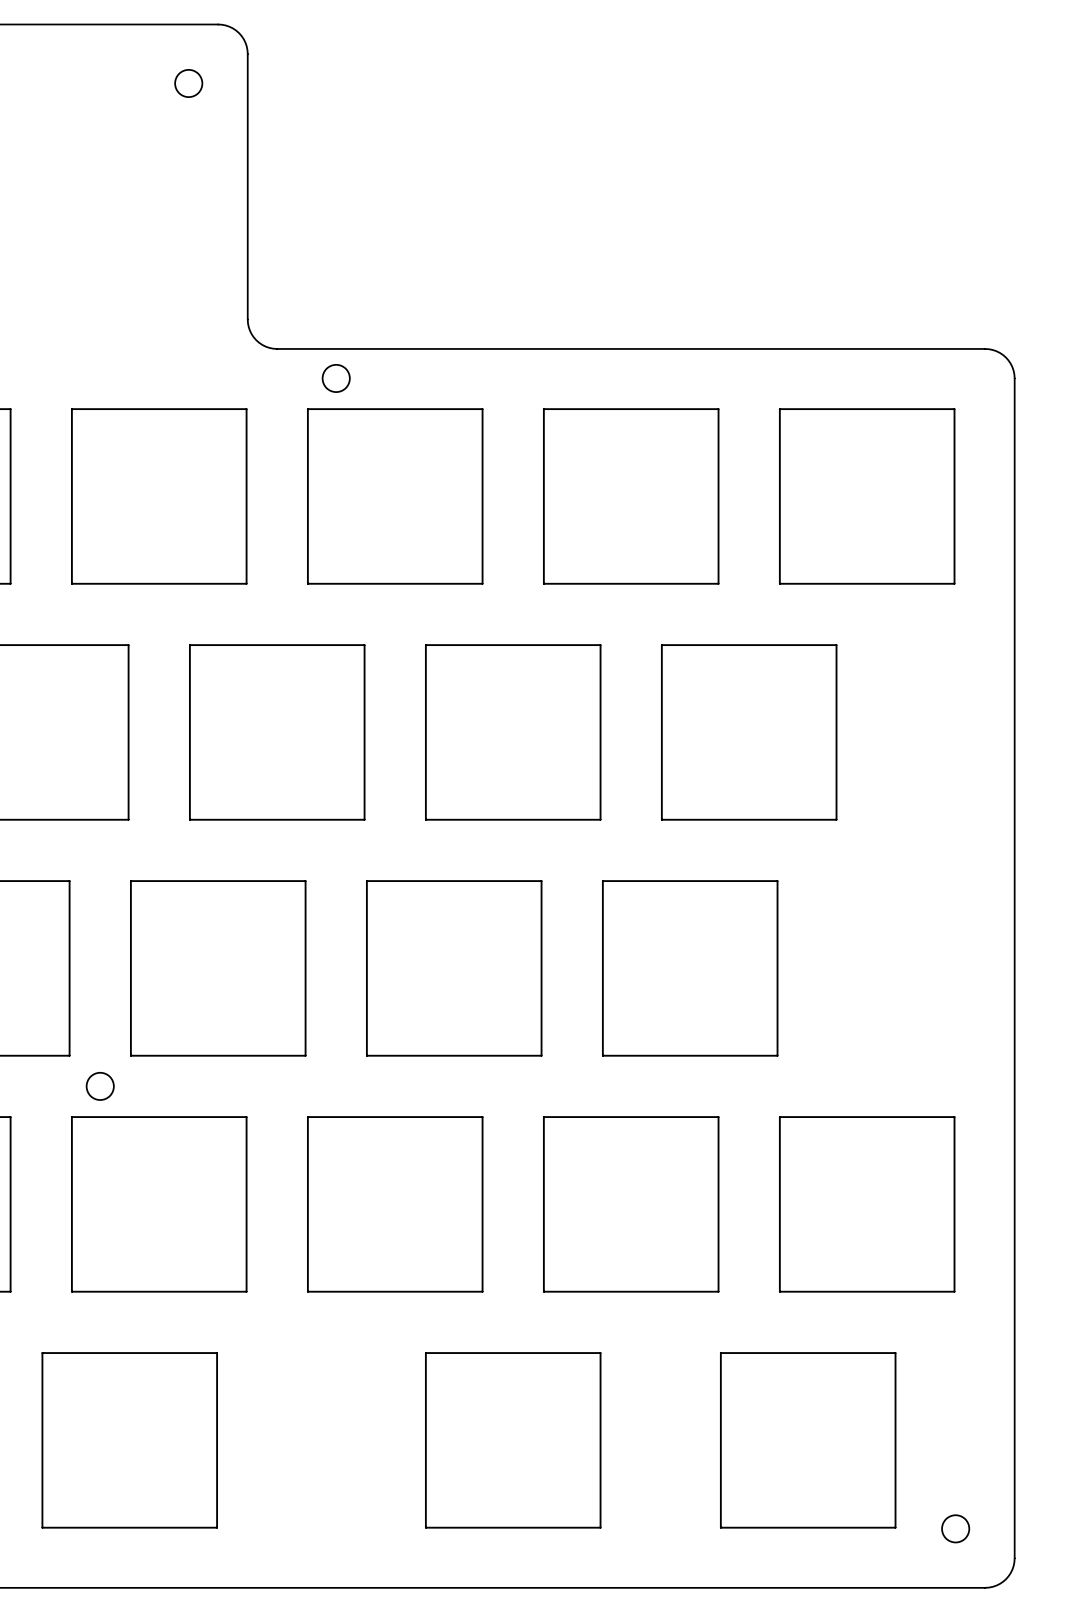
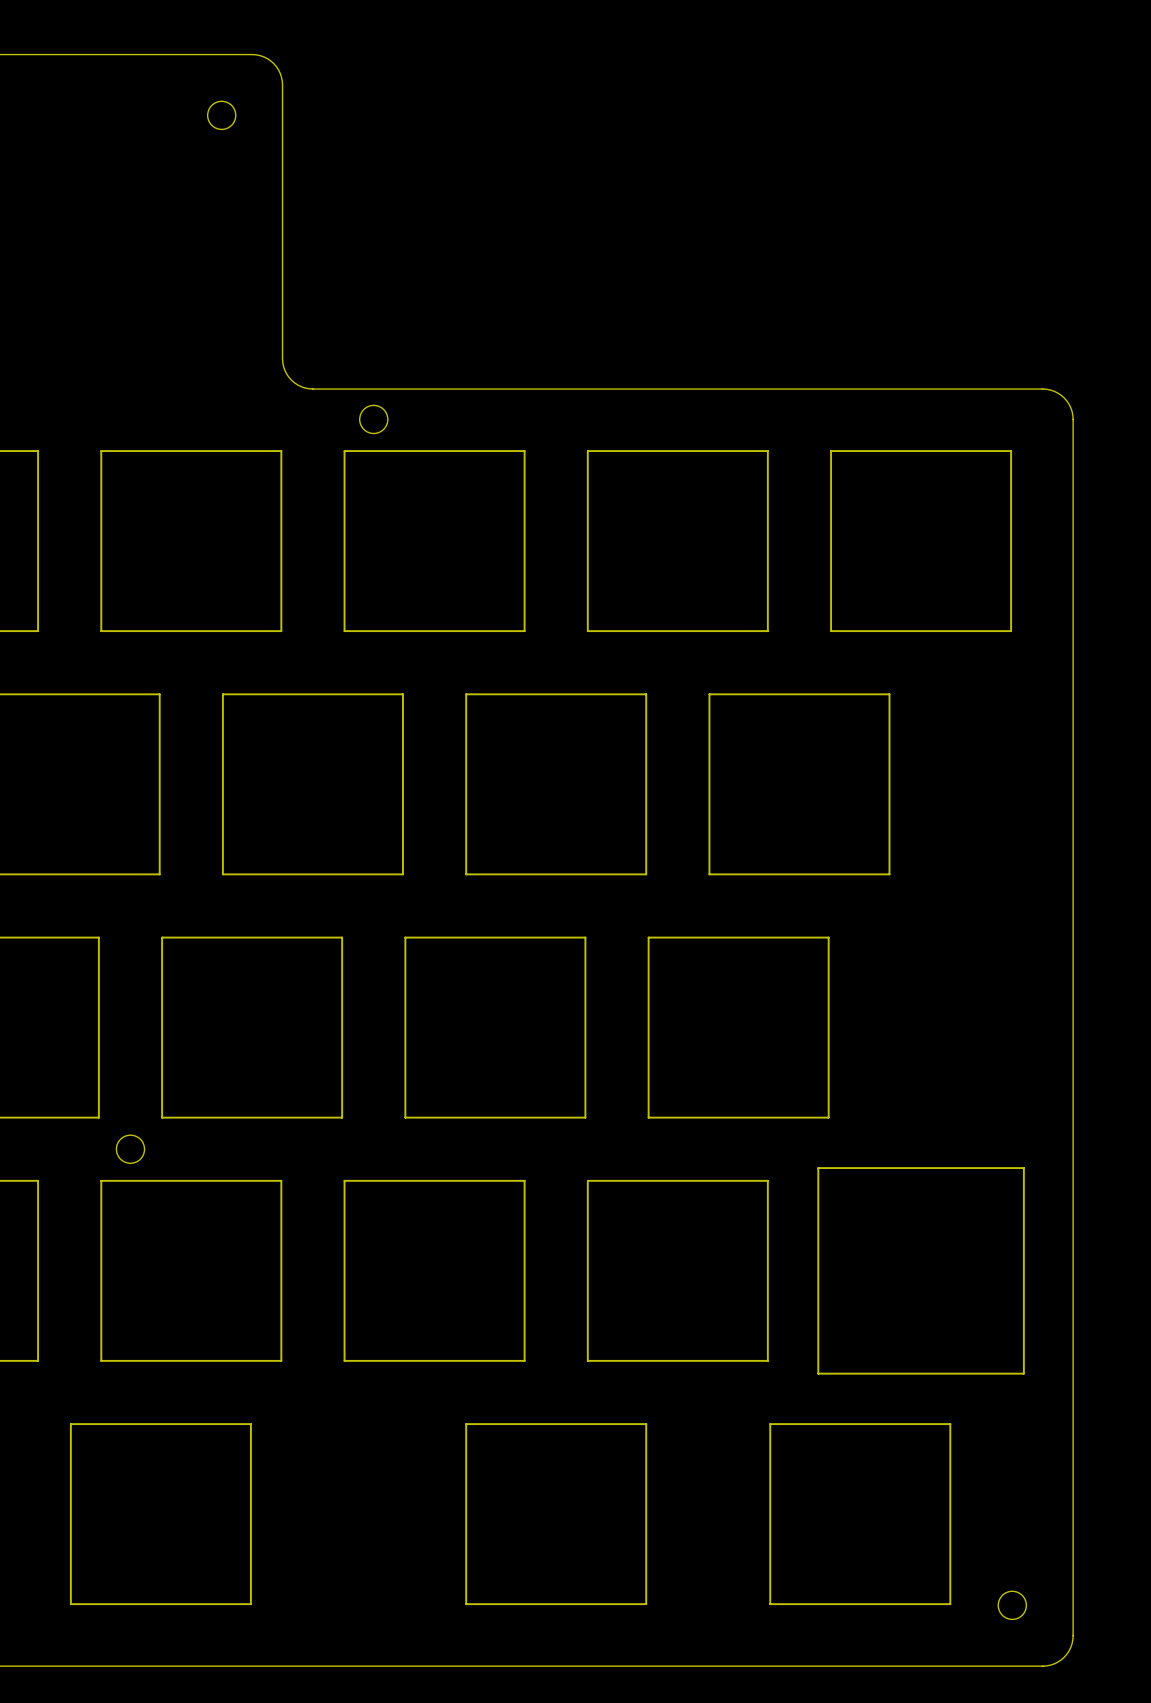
drawing shape: [778, 1116, 956, 1293] -> [817, 1167, 1025, 1375]

